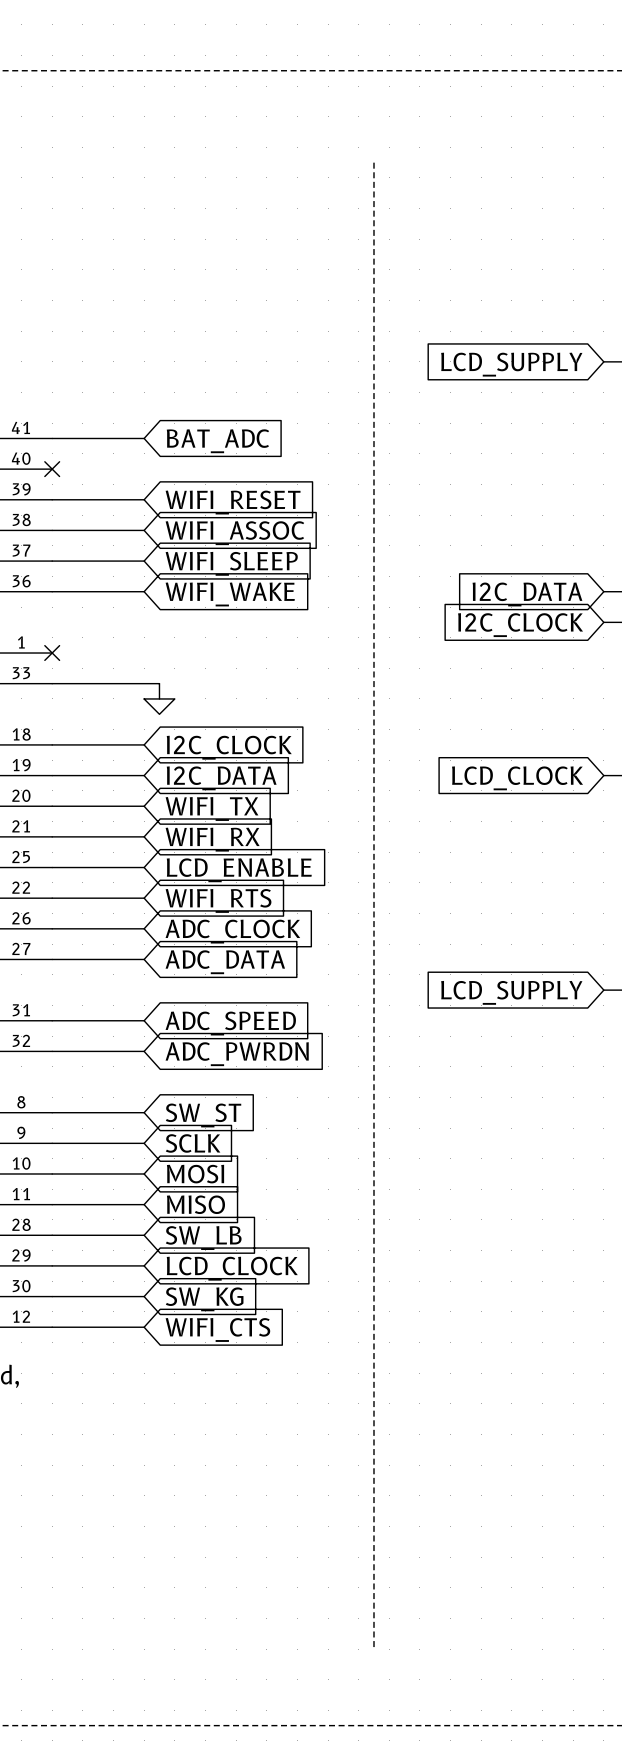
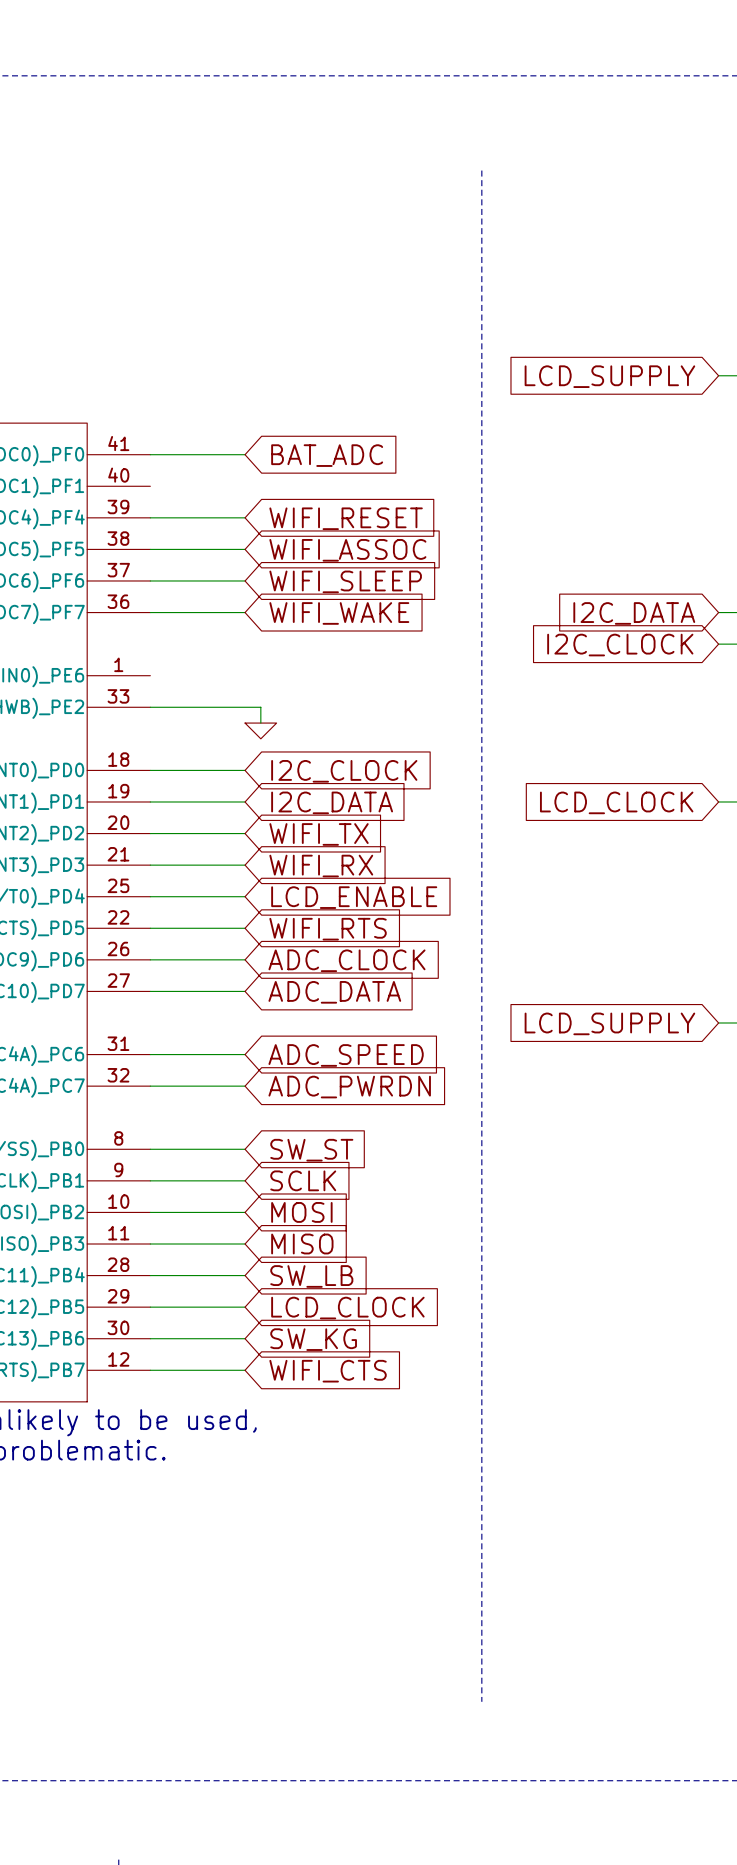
no-connect mark: (52, 469) -> none
no-connect mark: (52, 653) -> none

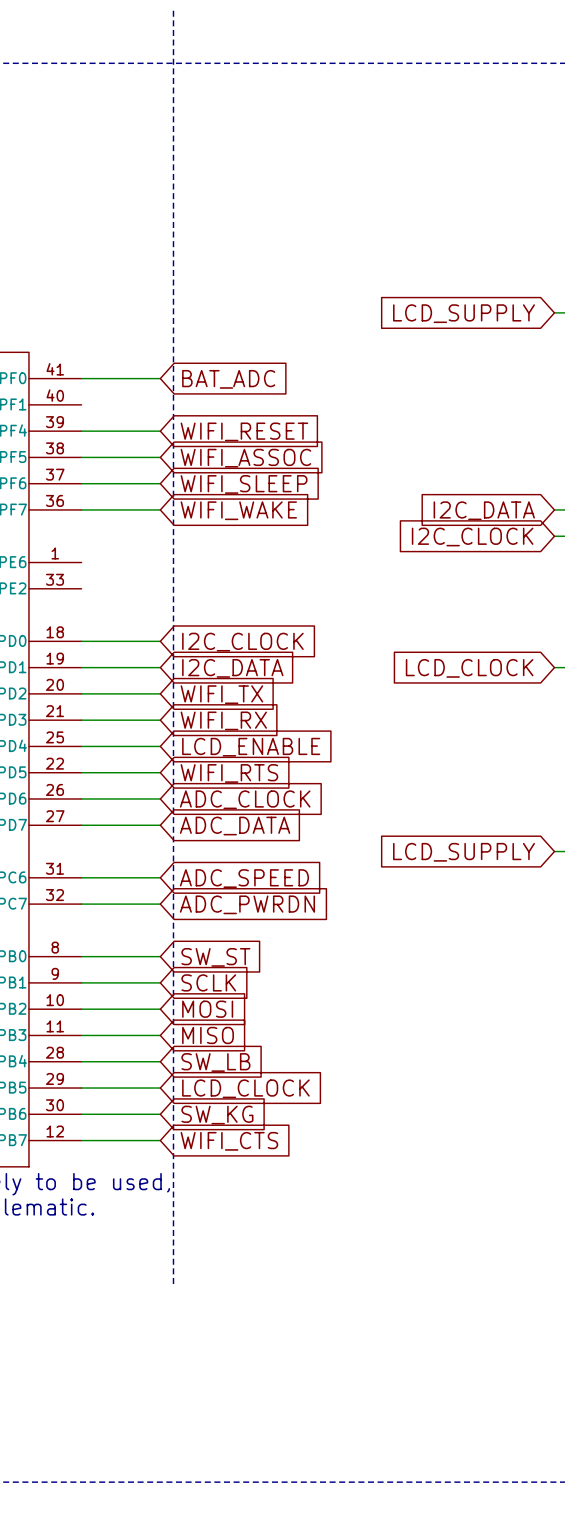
line: (481, 170) (481, 1701) -> (173, 10) (173, 1285)
wire: (150, 707) (260, 707) (260, 723) -> none
power symbol: (260, 730) -> none

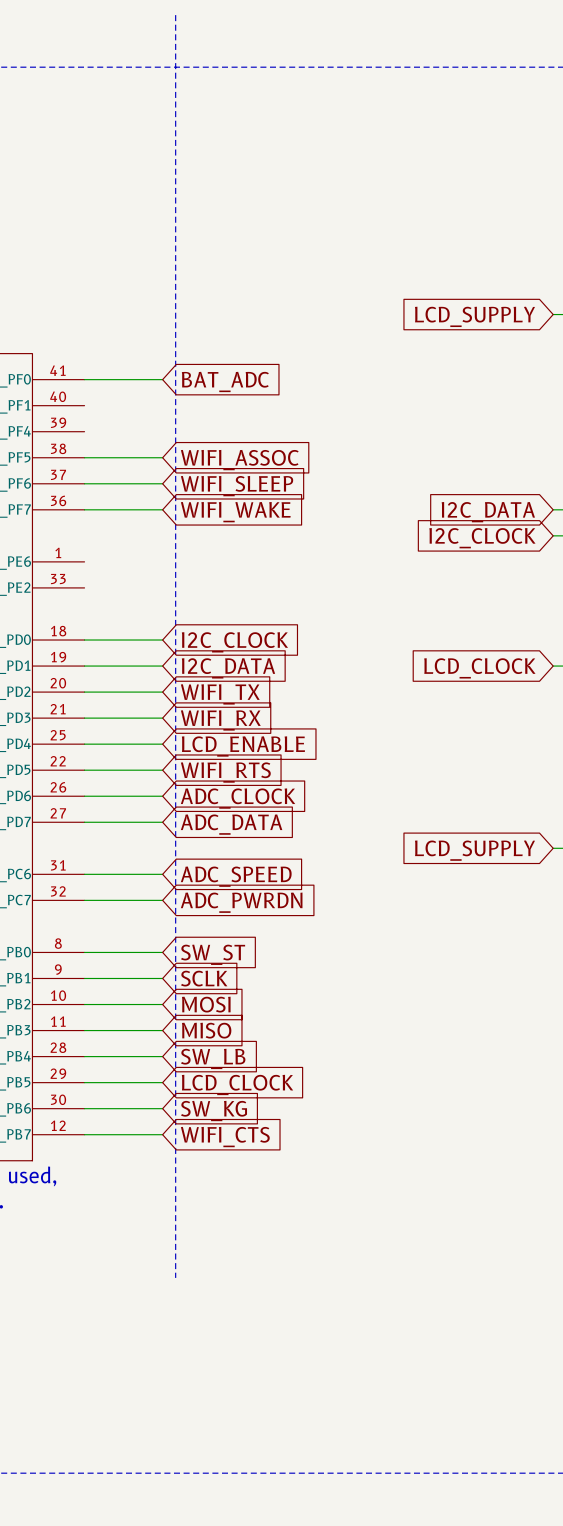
wire: (81, 431) (160, 431) -> none
global label: WIFI_RESET (244, 431) -> none

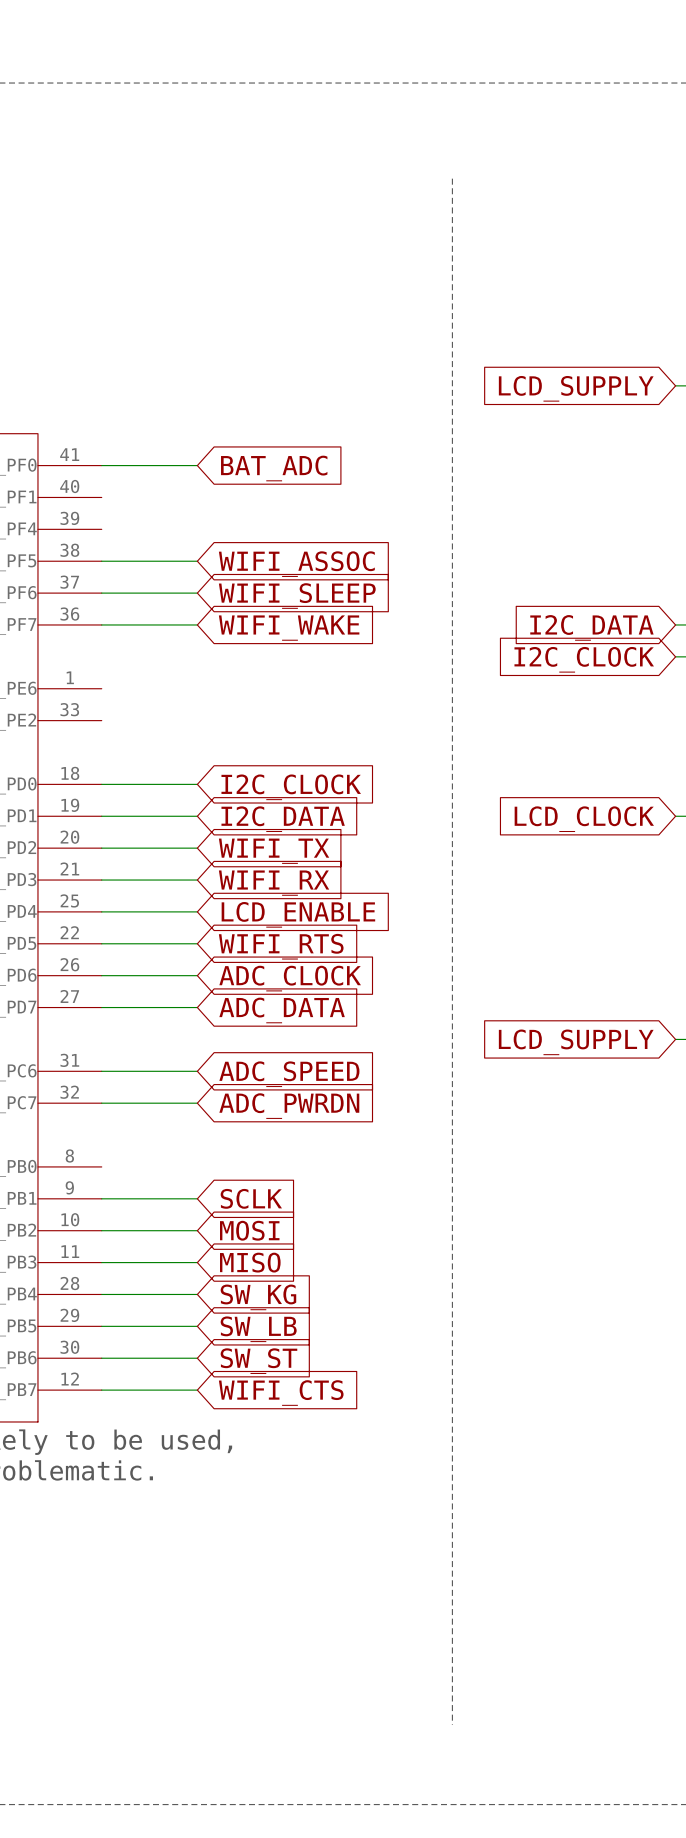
line: (175, 15) (175, 1277) -> (452, 178) (452, 1724)
wire: (84, 952) (162, 952) -> none
global label: SW_ST (213, 954) -> none
global label: SW_LB (213, 1058) -> SW_KG (258, 1297)
global label: LCD_CLOCK (237, 1084) -> SW_LB (258, 1329)
global label: SW_KG (214, 1111) -> SW_ST (258, 1361)

